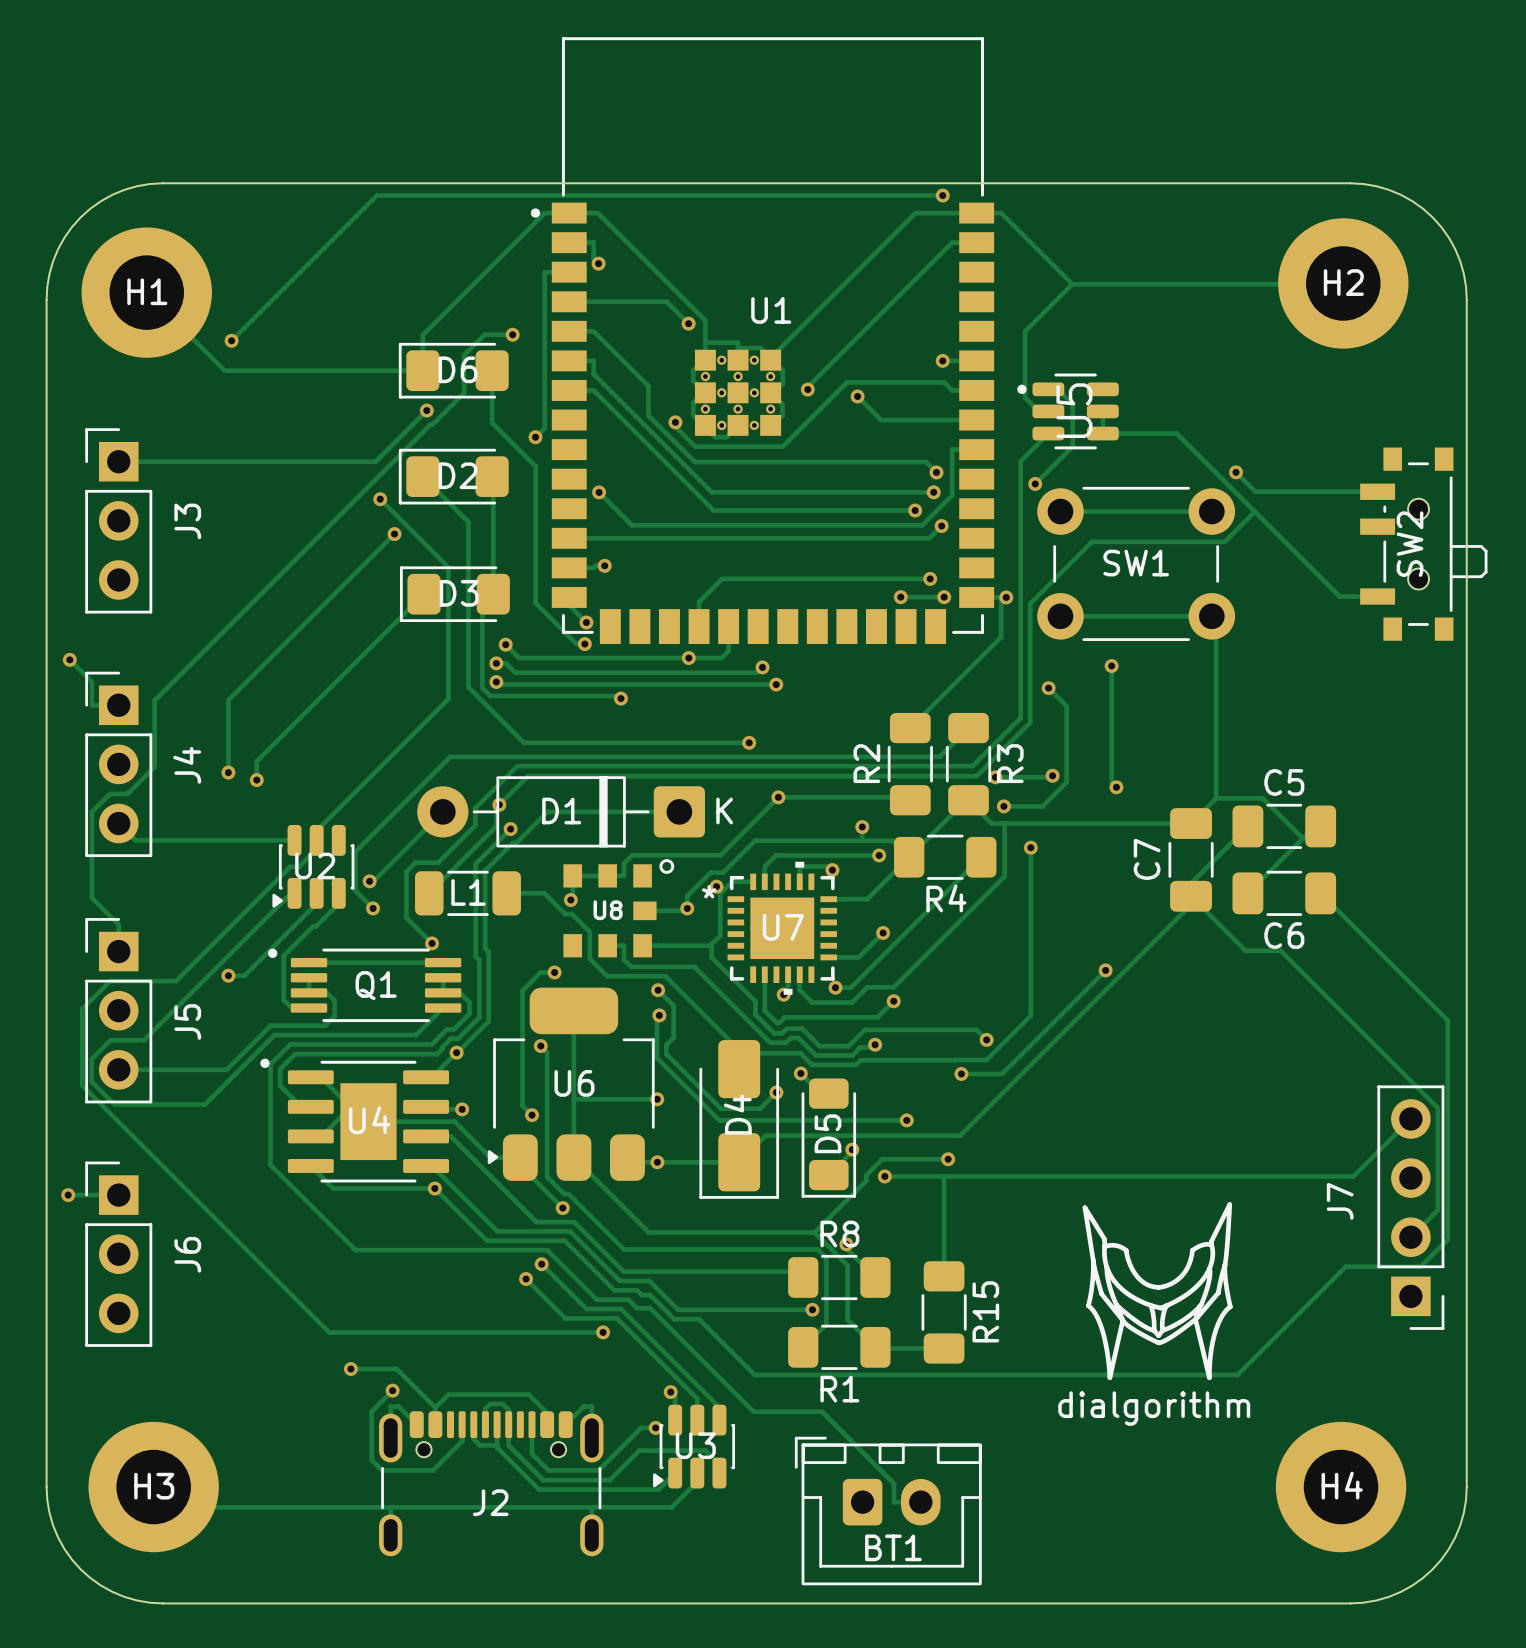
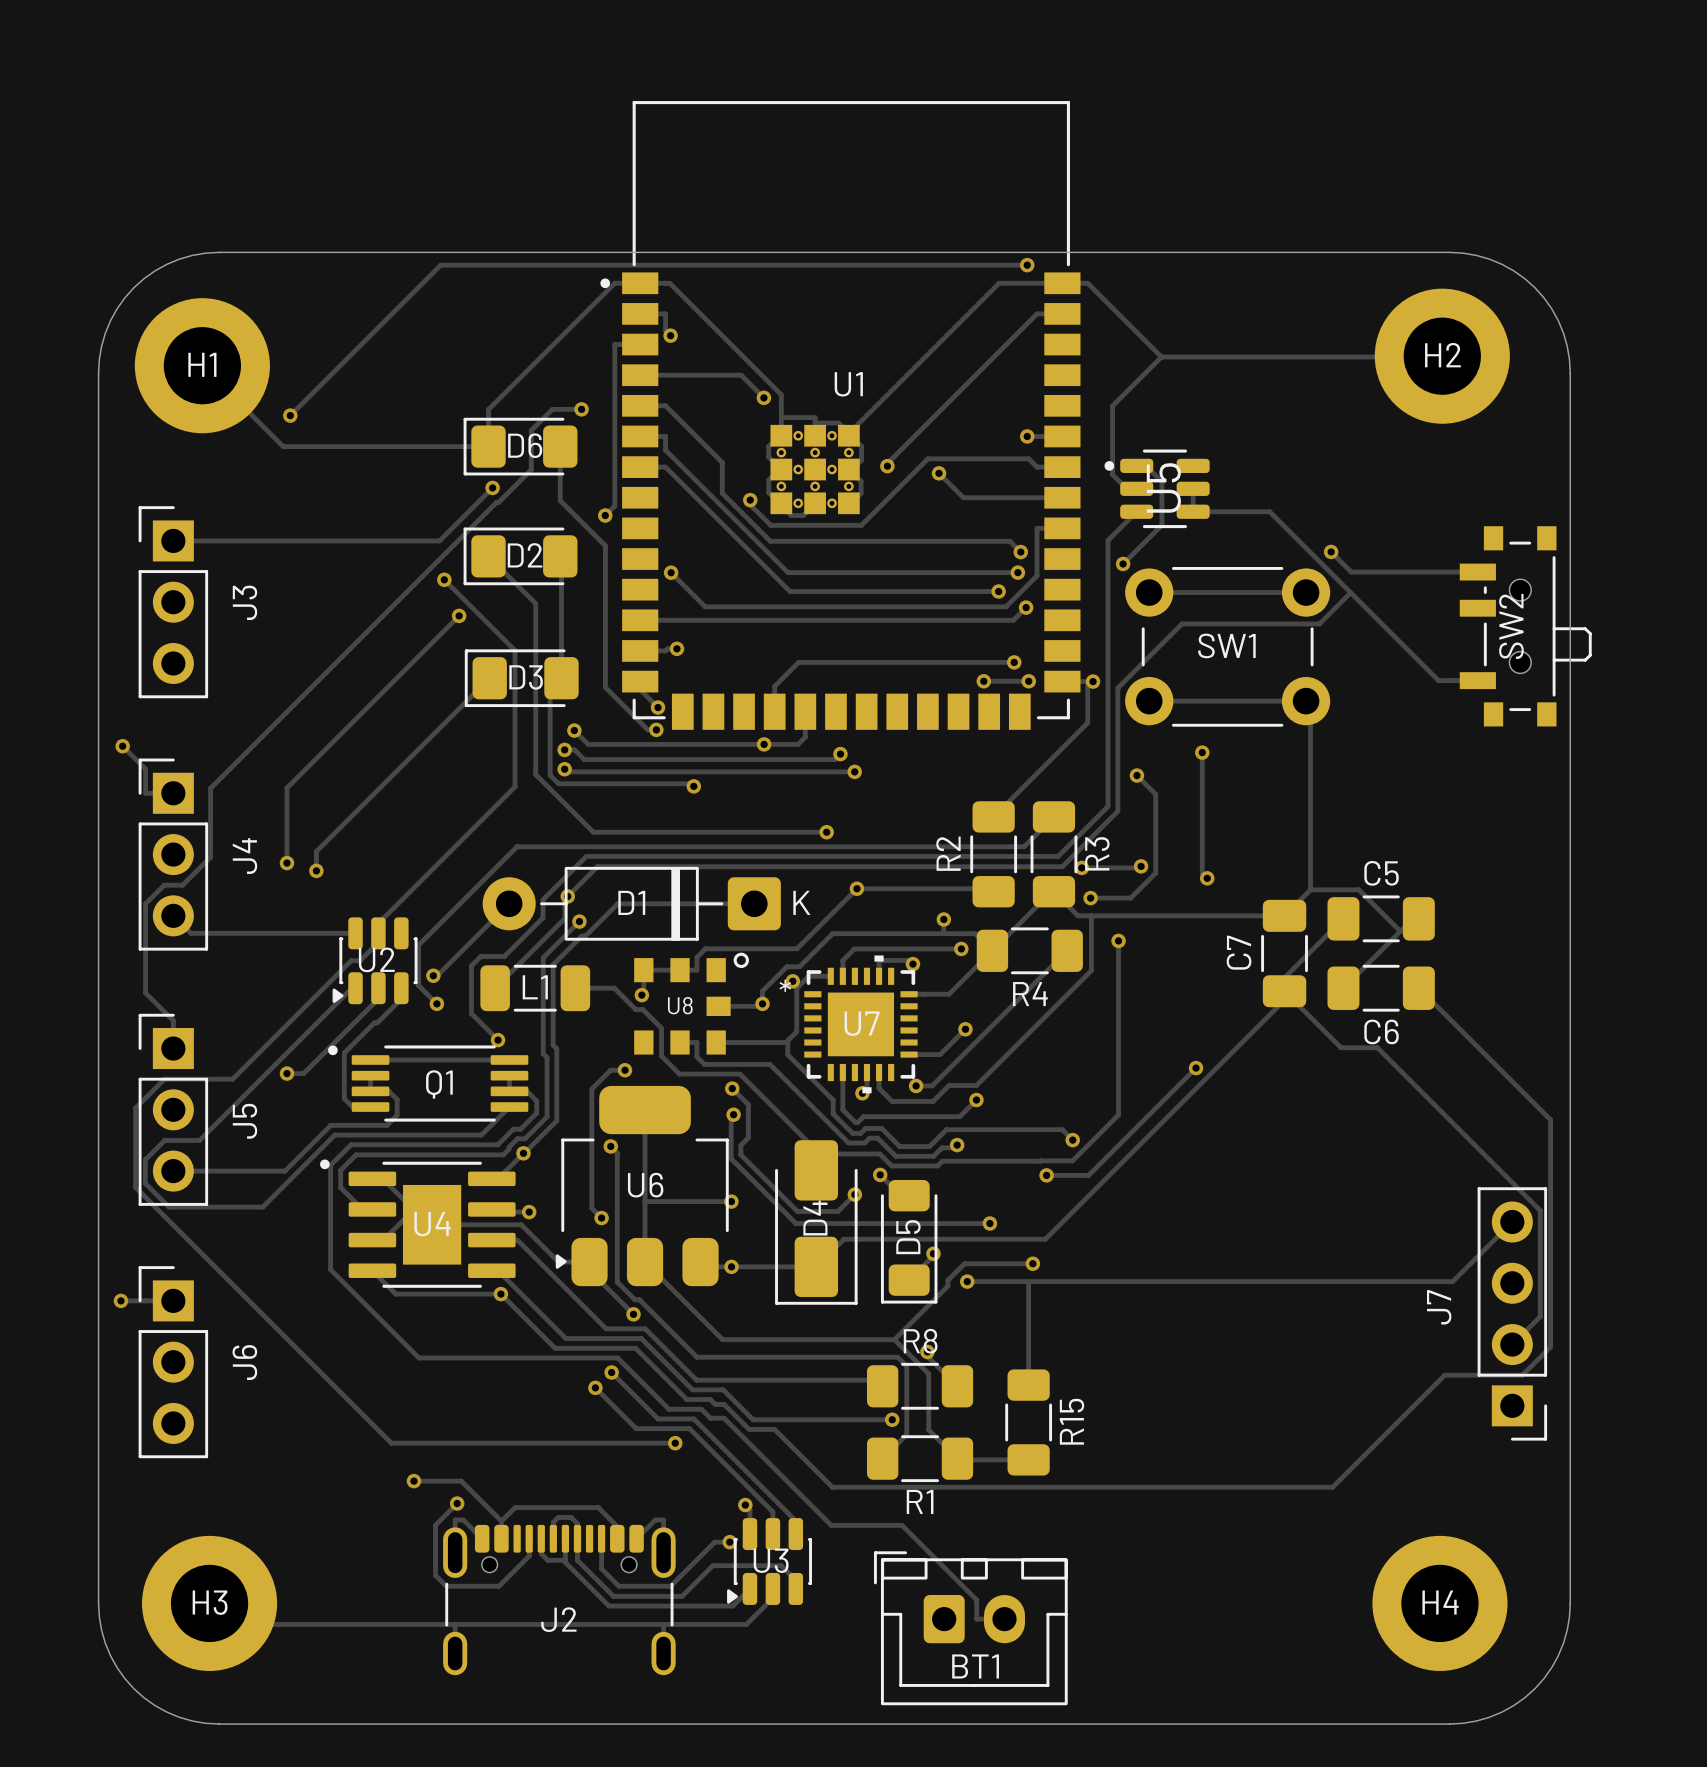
drawing: [1082, 1202, 1233, 1381] -> none

